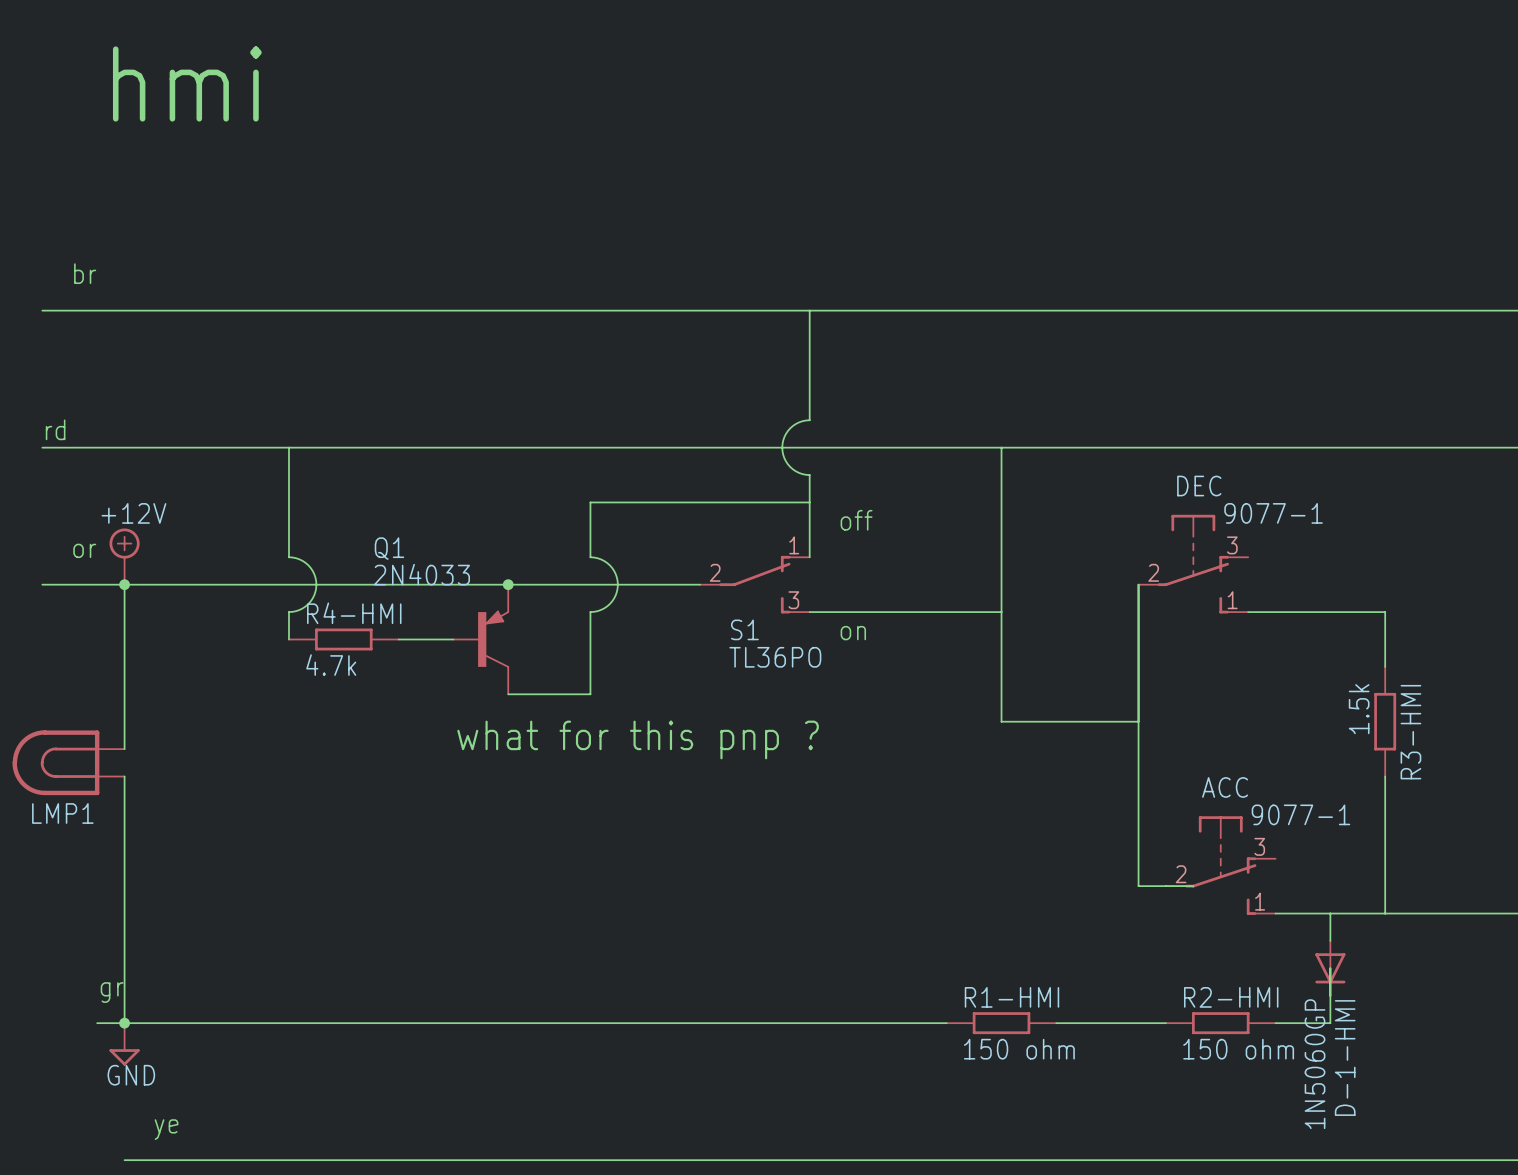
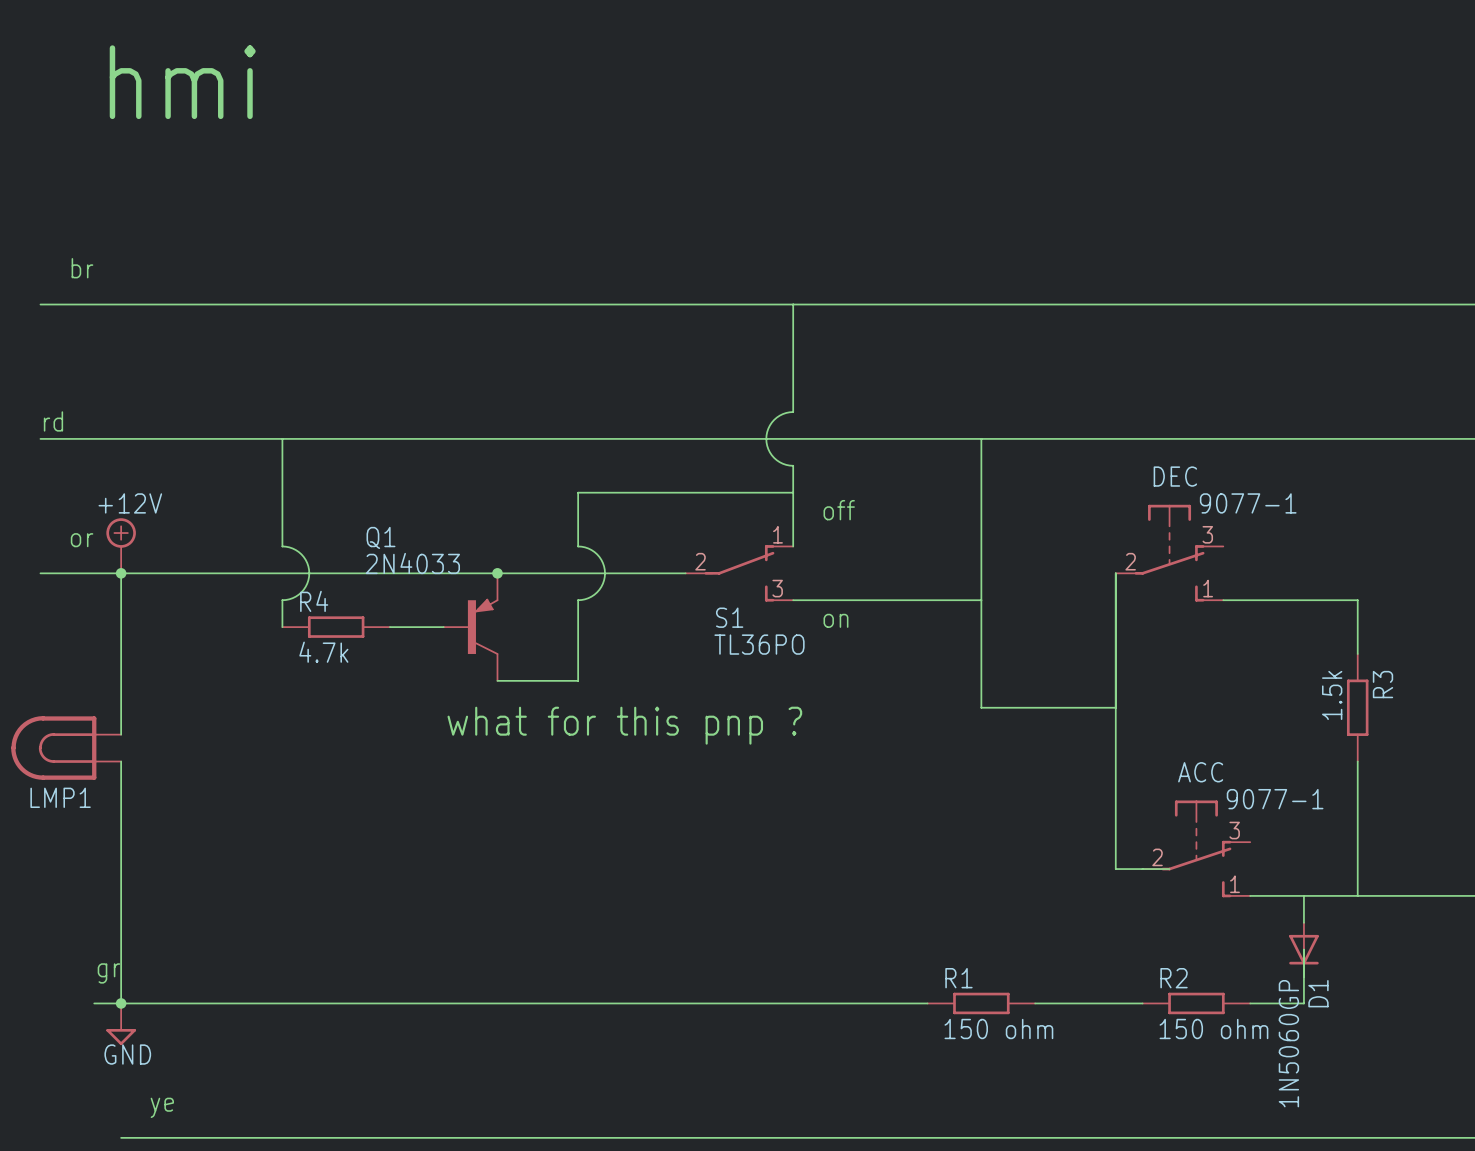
R4-HMI name: R4-HMI (354, 613) -> R4 (314, 601)
R3-HMI name: R3-HMI (1410, 732) -> R3 (1382, 684)
R1-HMI name: R1-HMI (1011, 997) -> R1 (958, 978)
R2-HMI name: R2-HMI (1231, 997) -> R2 (1174, 978)
D-1-HMI name: D-1-HMI (1345, 1058) -> D1 (1318, 993)

